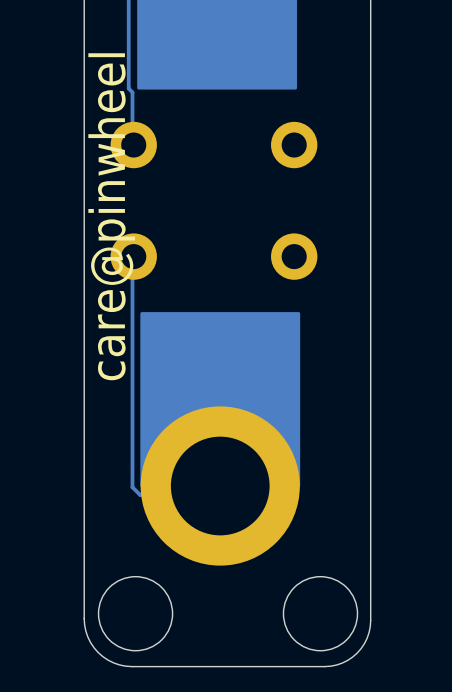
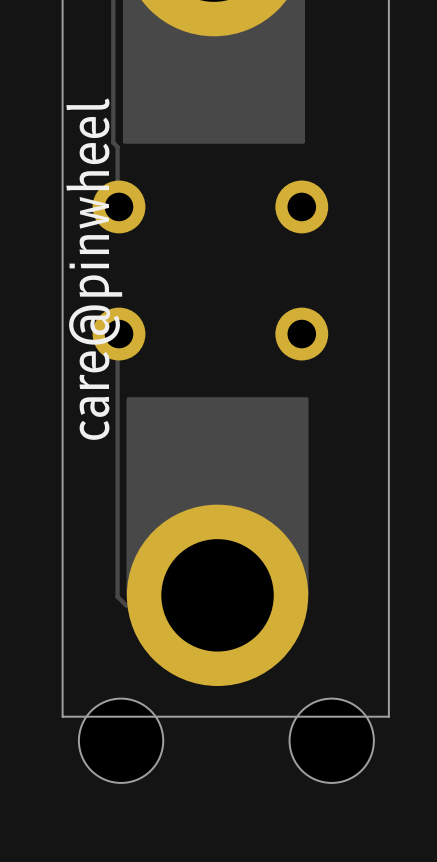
board edge: (370, 592) (370, 626) (364, 643) (357, 653) (347, 660) (336, 665) (324, 666) (132, 666) (119, 664) (108, 660) (98, 652) (87, 637) (84, 624) (84, 592) -> (388, 716) (62, 716)

